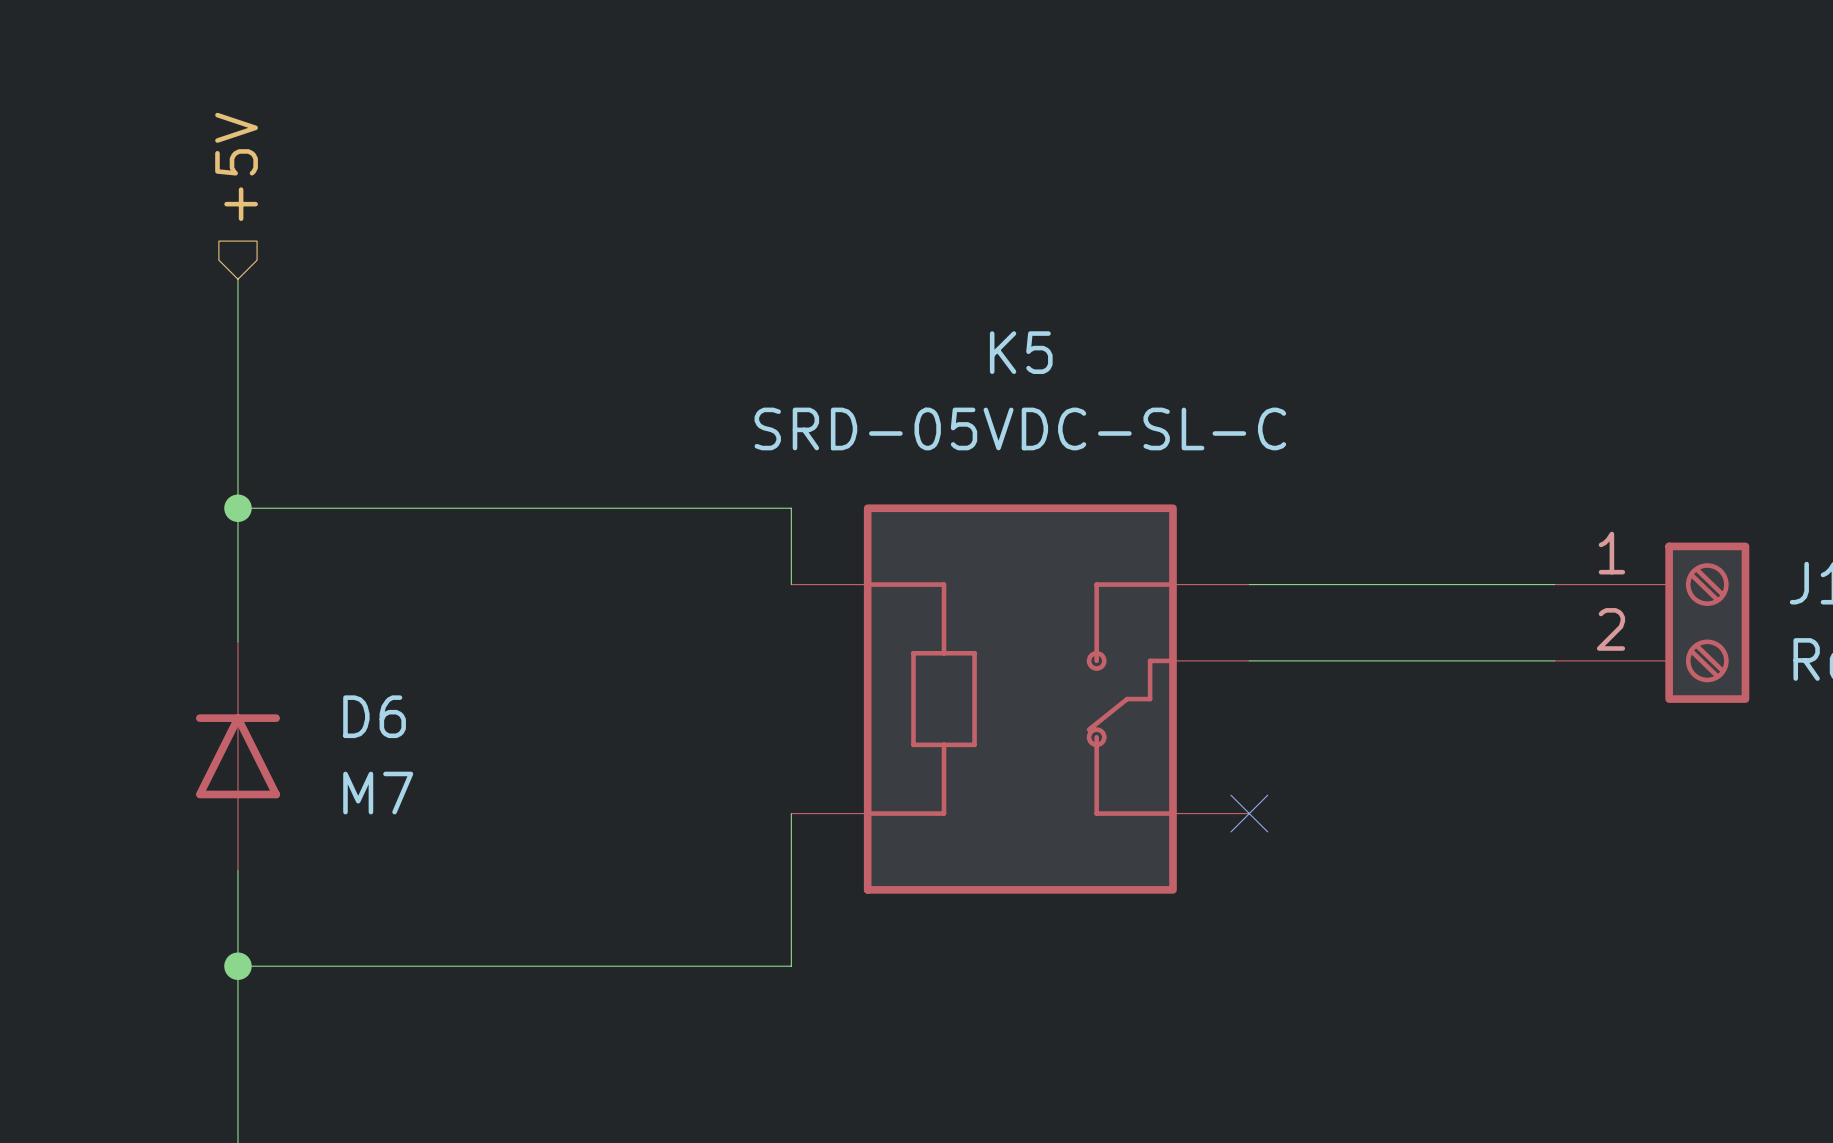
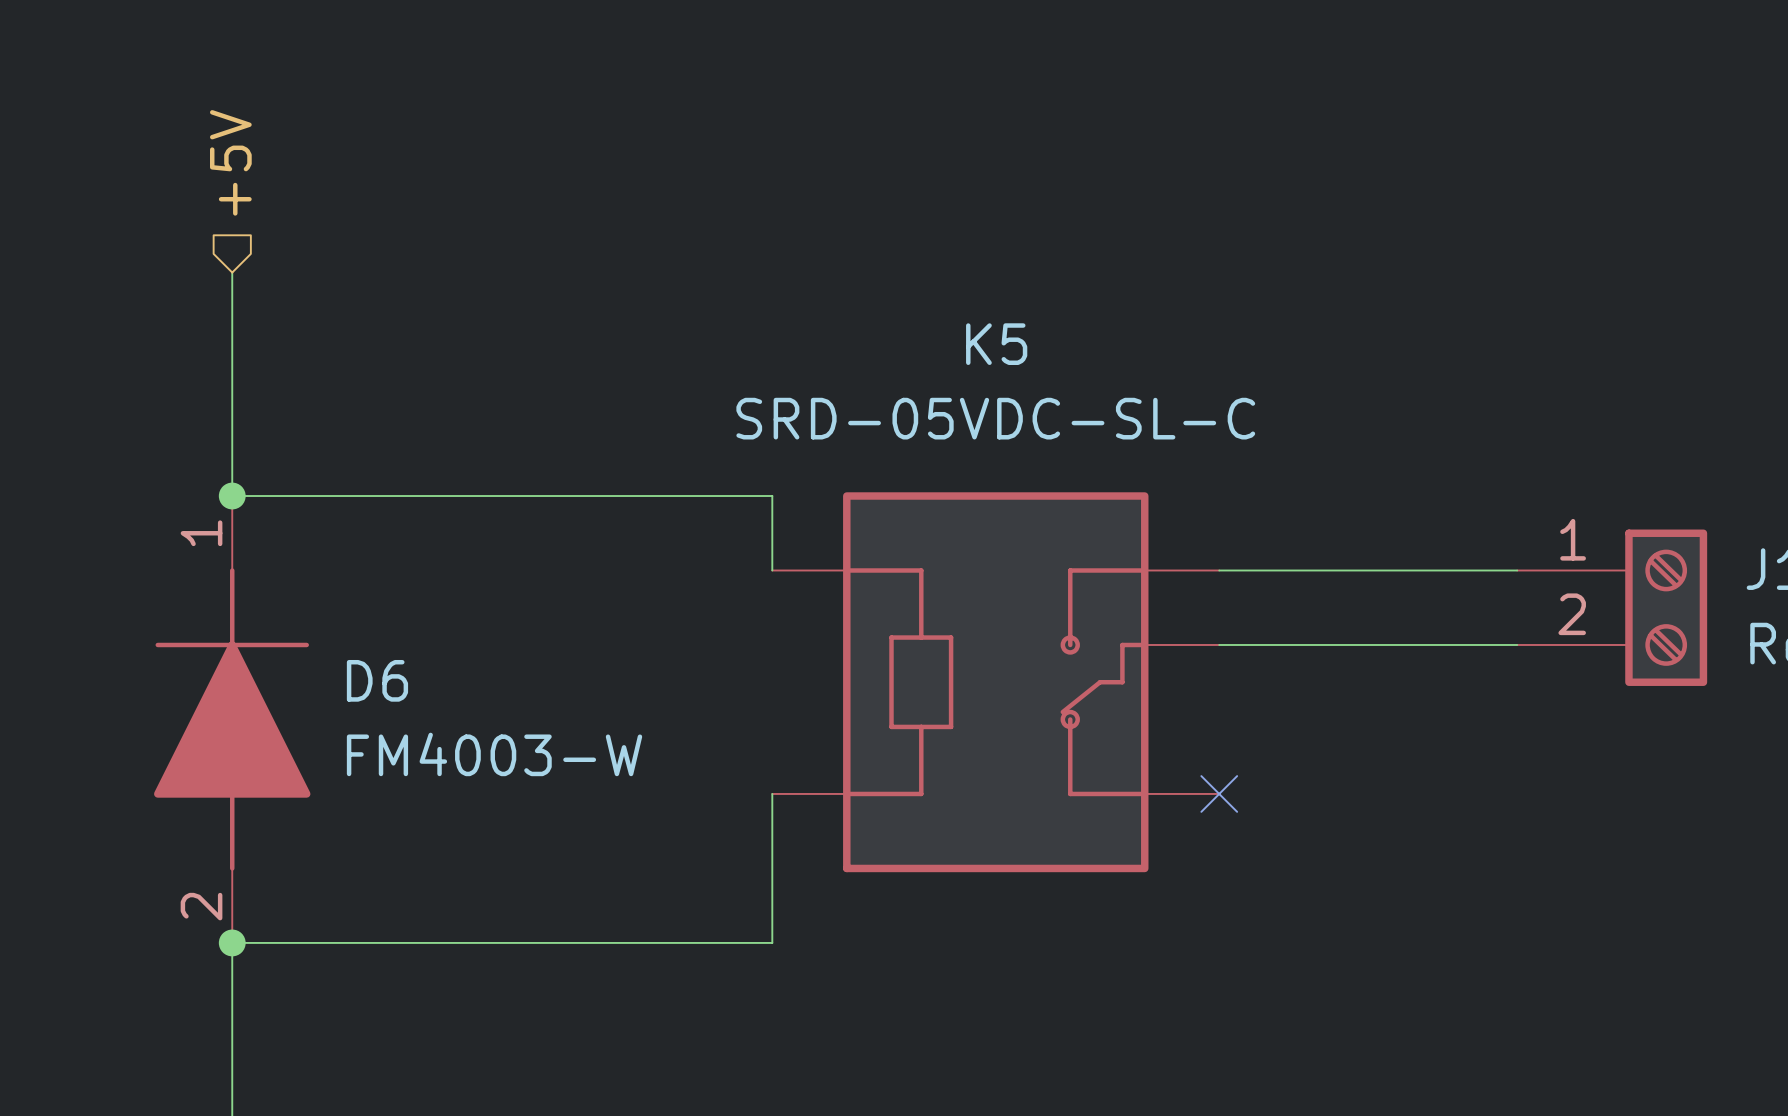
D6 symbol: [196, 641, 280, 871] -> [154, 496, 311, 943]
D6 value: M7 (378, 793) -> FM4003-W (494, 754)

